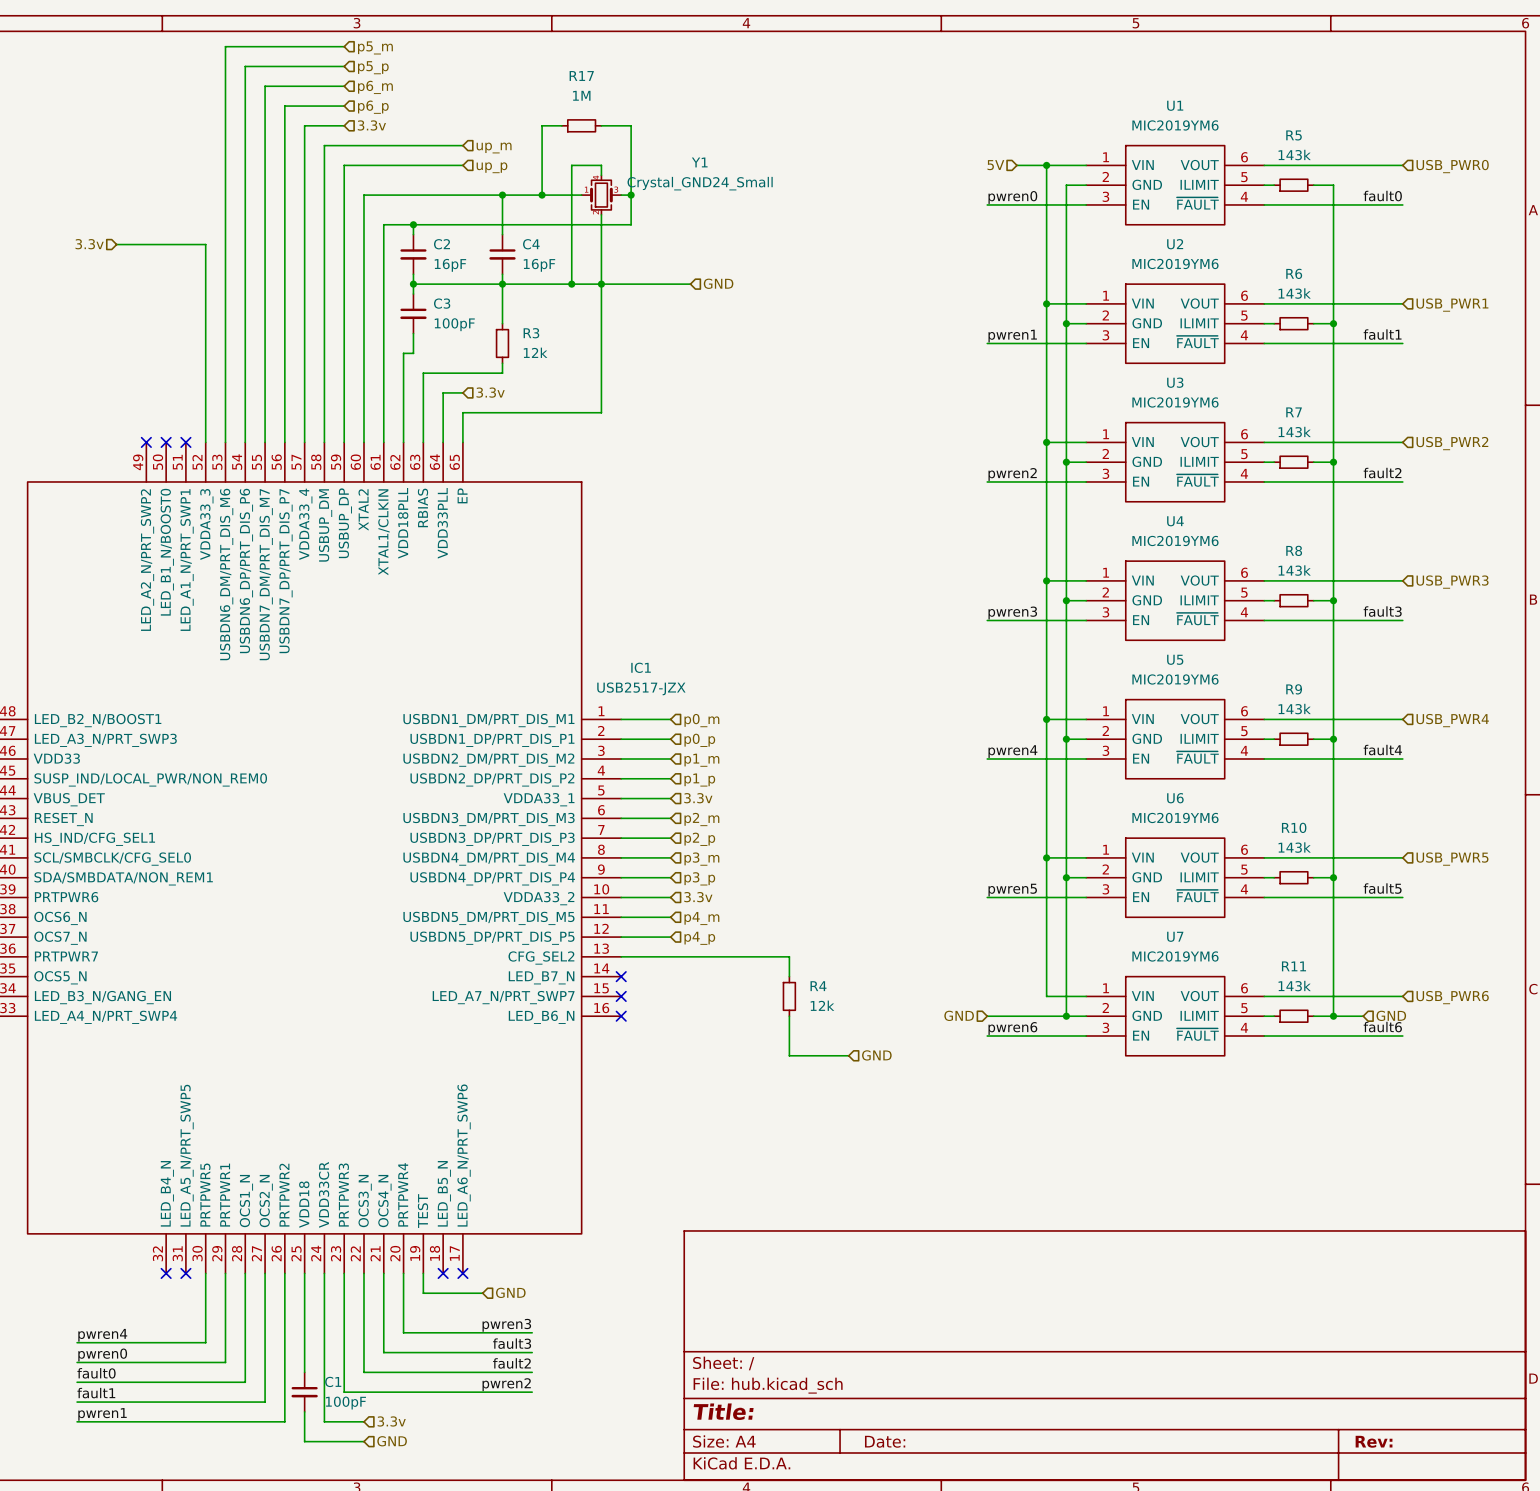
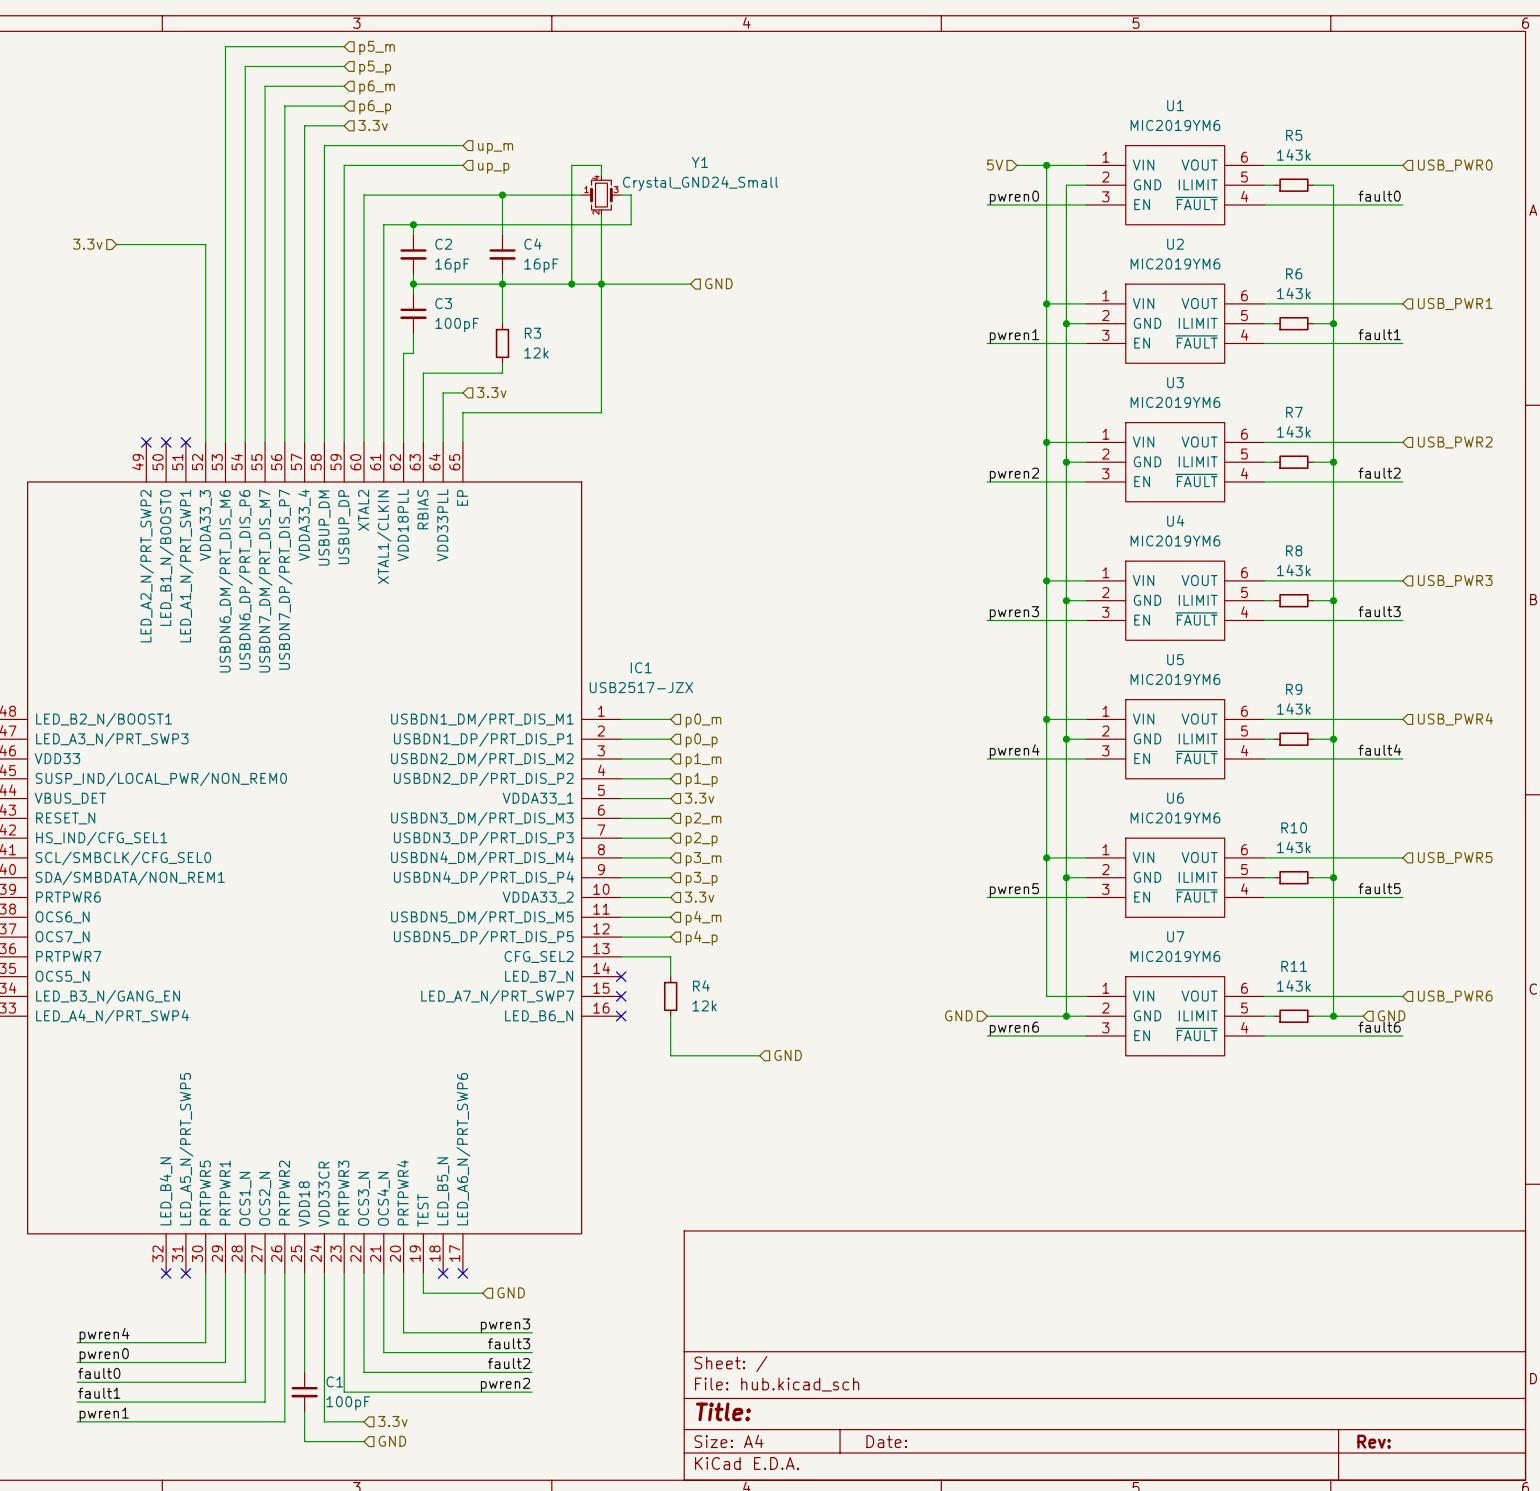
wire: (561, 125) (542, 125) (542, 195) -> none
R17: 1M (581, 125) -> none
wire: (601, 125) (631, 125) (631, 195) -> none
junction: (542, 195) -> none
junction: (631, 195) -> none
wire: (670, 956) (789, 956) (789, 976) -> (670, 956) (670, 976)
R4 position: (789, 996) -> (670, 996)
wire: none -> (670, 1016) (670, 1055) (759, 1055)
wire: (789, 1016) (789, 1055) (848, 1055) -> none
hierarchical label position: GND (876, 1055) -> GND (788, 1055)

